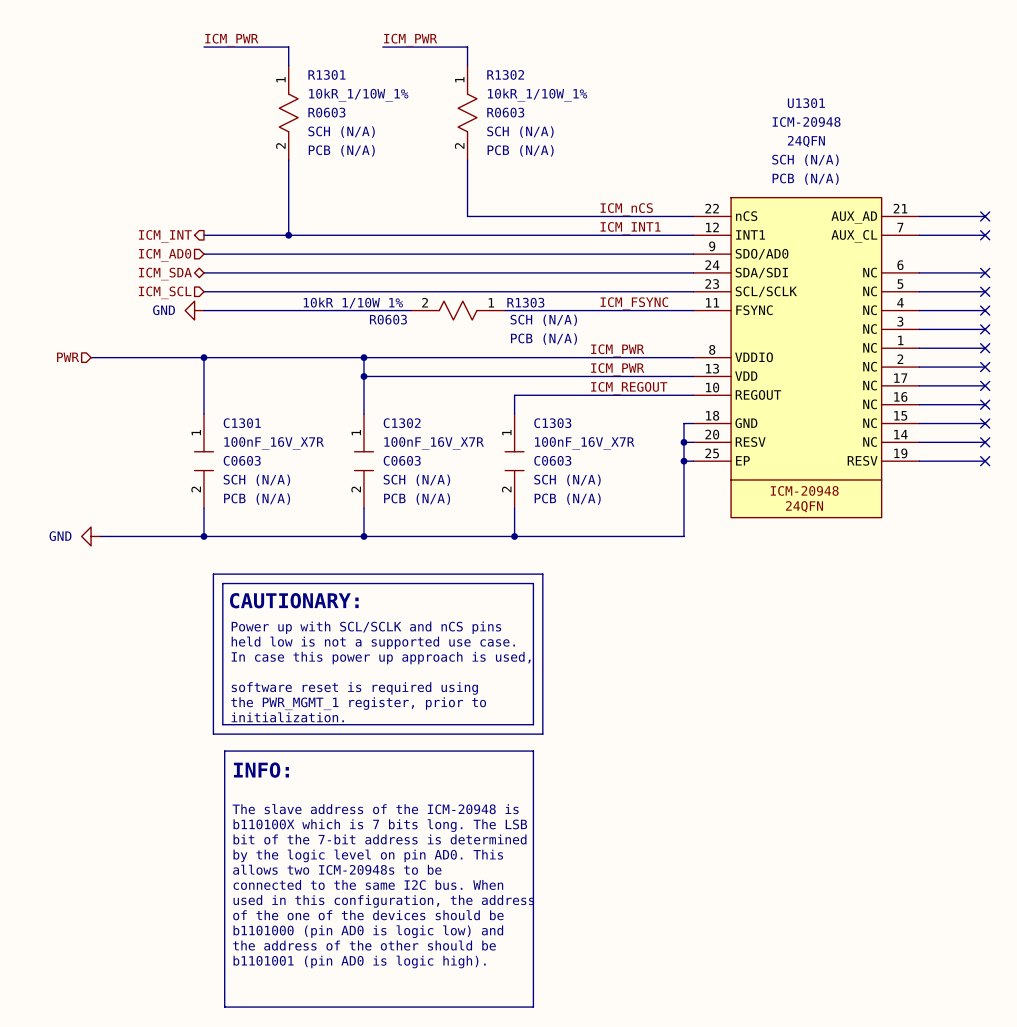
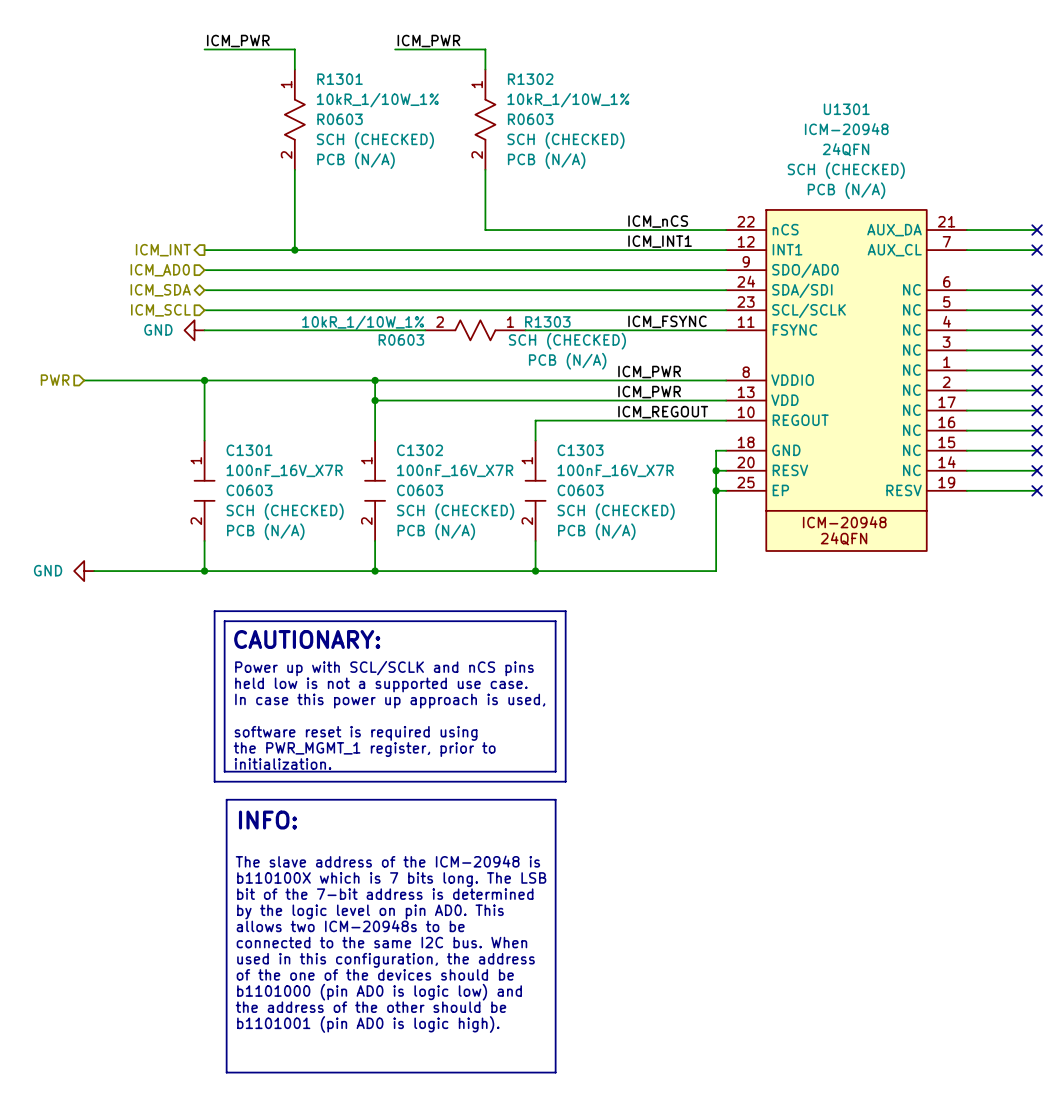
R1301 text: SCH (N/A) (341, 132) -> SCH (CHECKED) (375, 140)
R1302 text: SCH (N/A) (520, 132) -> SCH (CHECKED) (565, 140)
U1301 text: SCH (N/A) (805, 160) -> SCH (CHECKED) (846, 170)
U1301 pin name: AUX_AD (854, 217) -> AUX_DA (894, 230)
R1303 text: SCH (N/A) (543, 320) -> SCH (CHECKED) (567, 341)
C1301 text: SCH (N/A) (256, 480) -> SCH (CHECKED) (285, 511)
C1302 text: SCH (N/A) (416, 480) -> SCH (CHECKED) (455, 511)
C1303 text: SCH (N/A) (567, 480) -> SCH (CHECKED) (616, 511)

